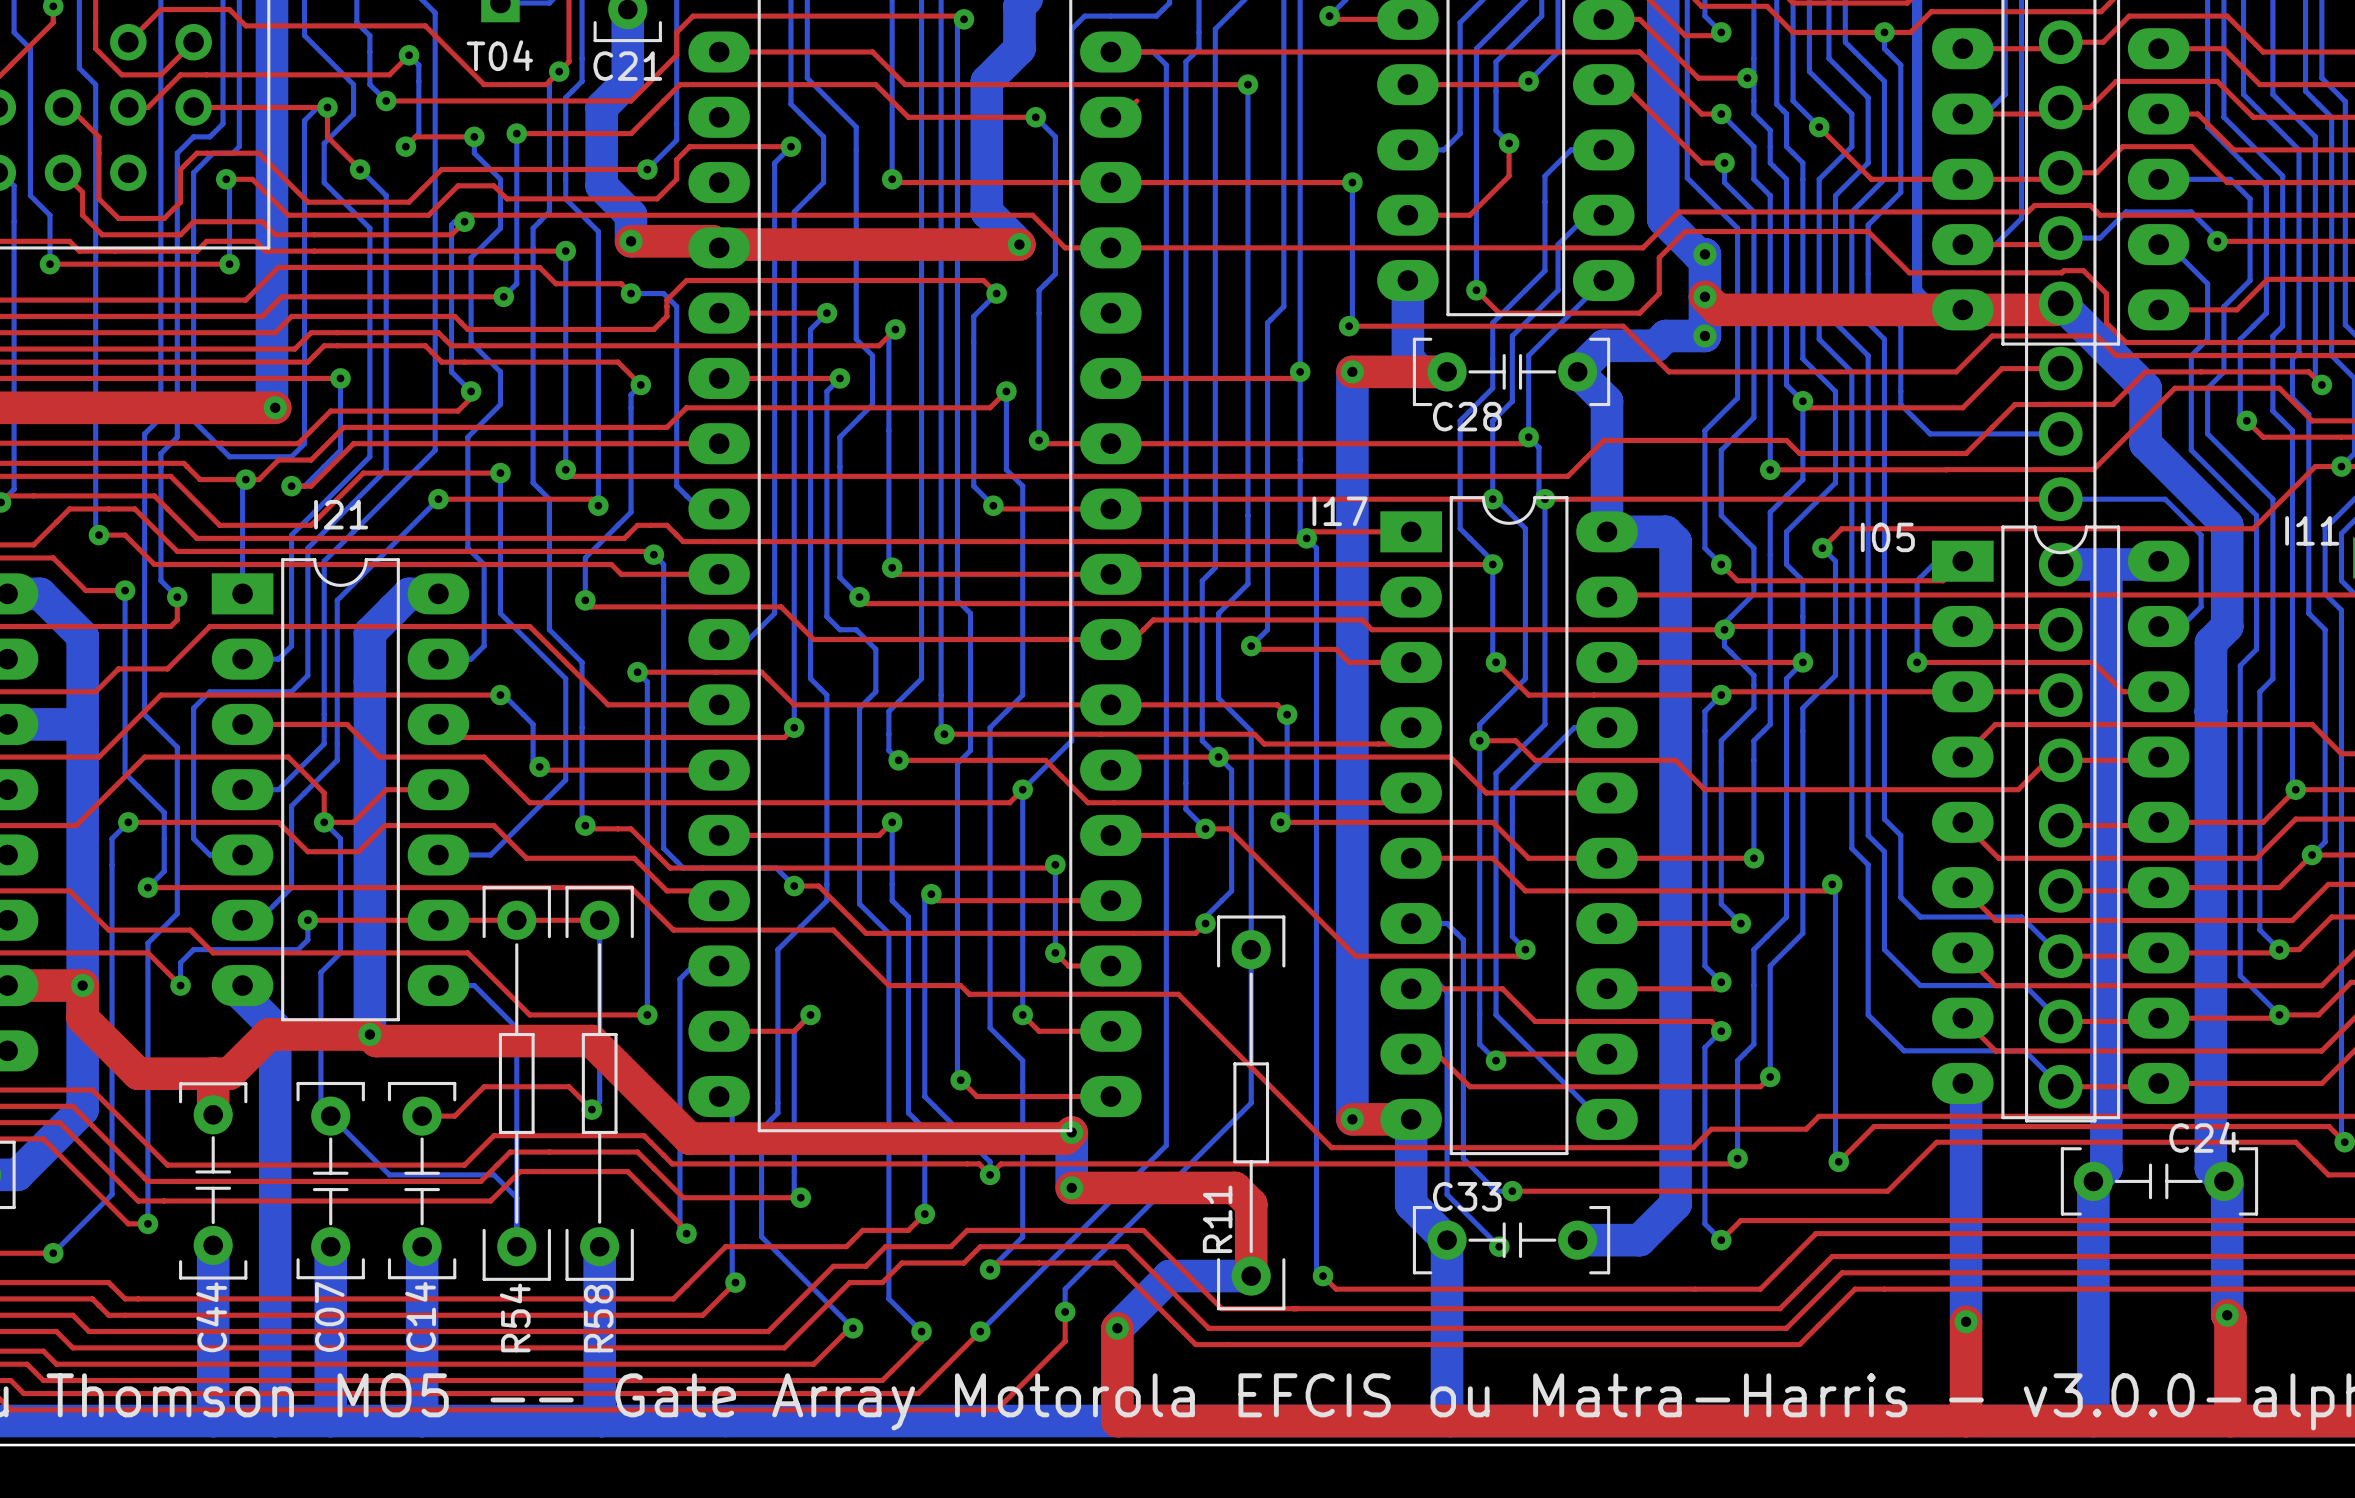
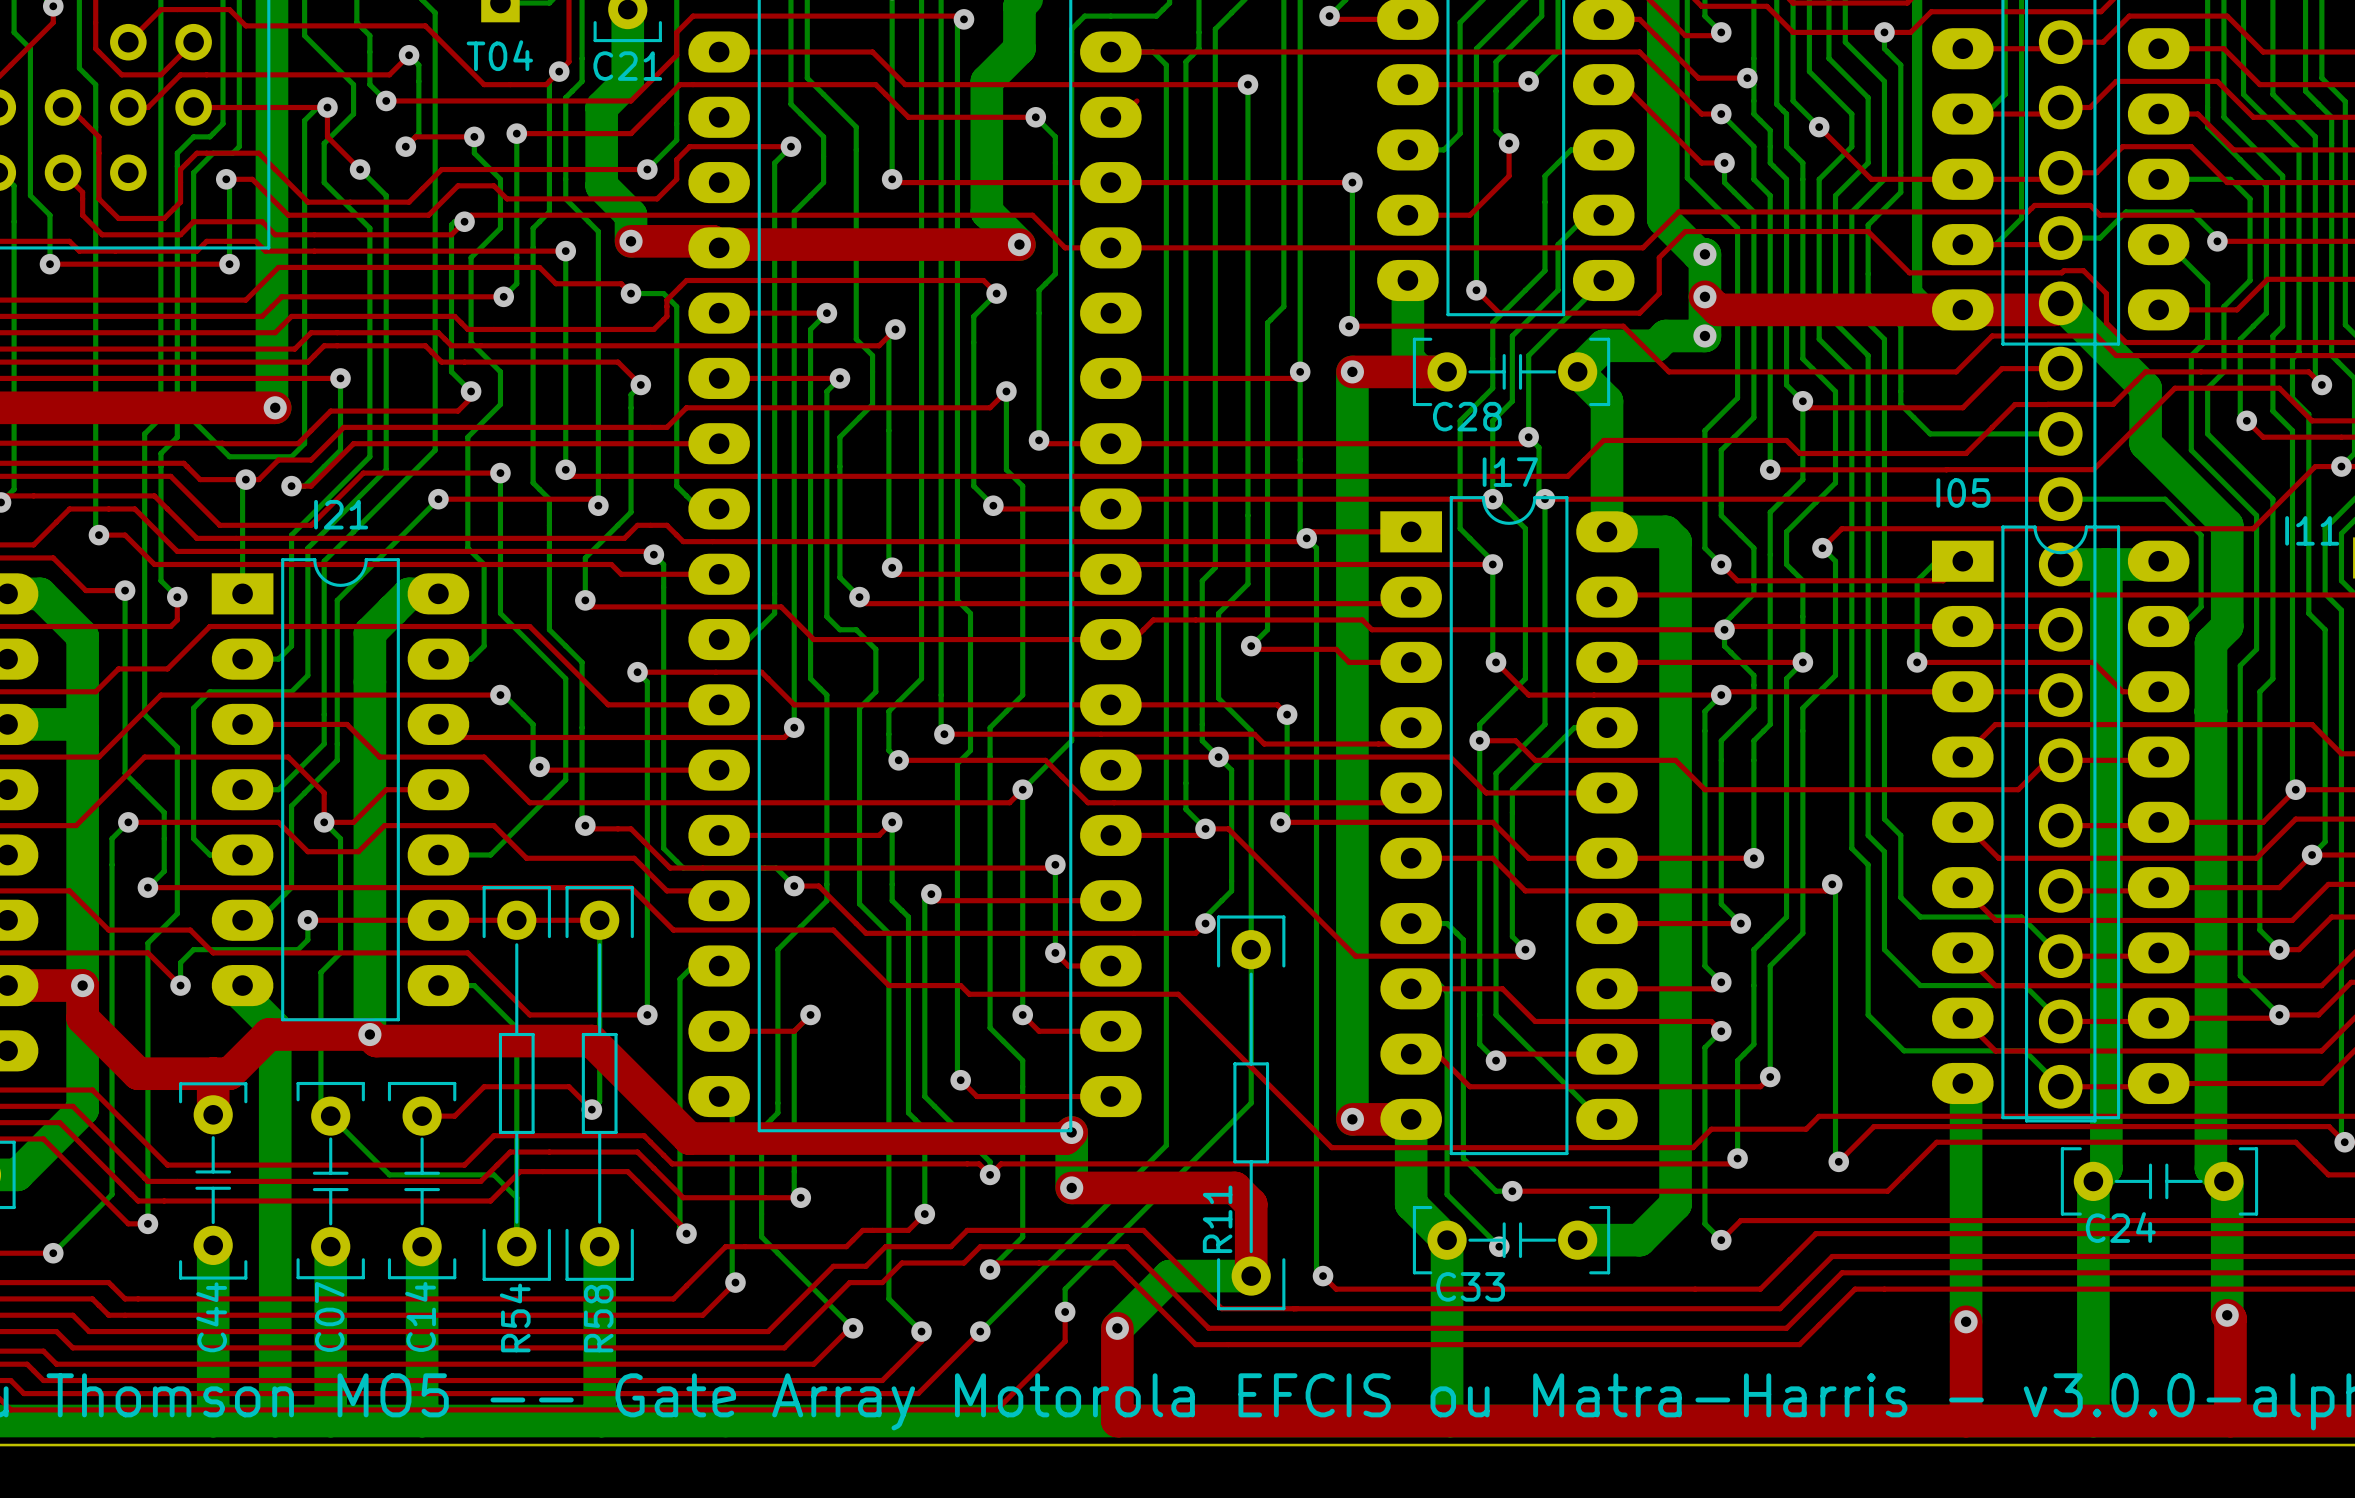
I17 name position: I17 (1340, 511) -> I17 (1510, 472)
I05 name position: I05 (1887, 537) -> I05 (1963, 492)
C24 name position: C24 (2204, 1137) -> C24 (2120, 1227)
C33 name position: C33 (1467, 1196) -> C33 (1470, 1286)

